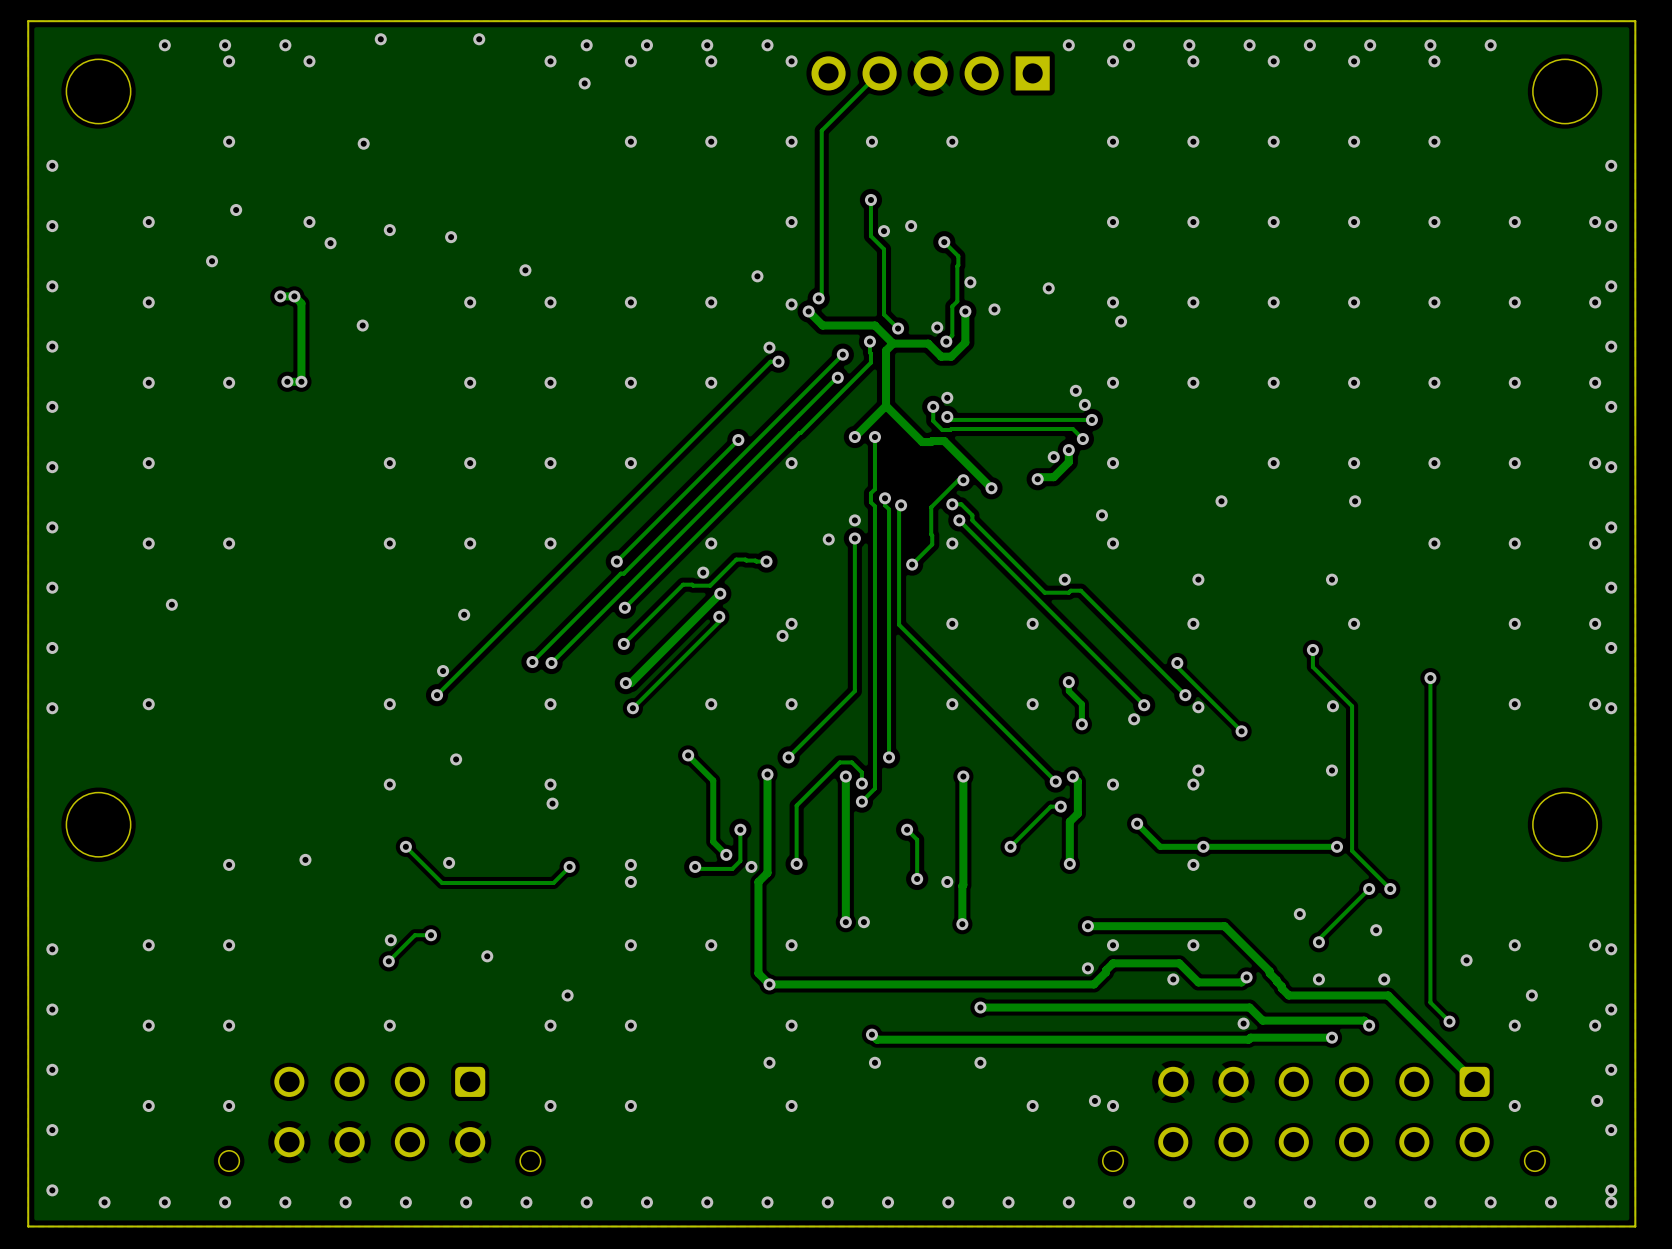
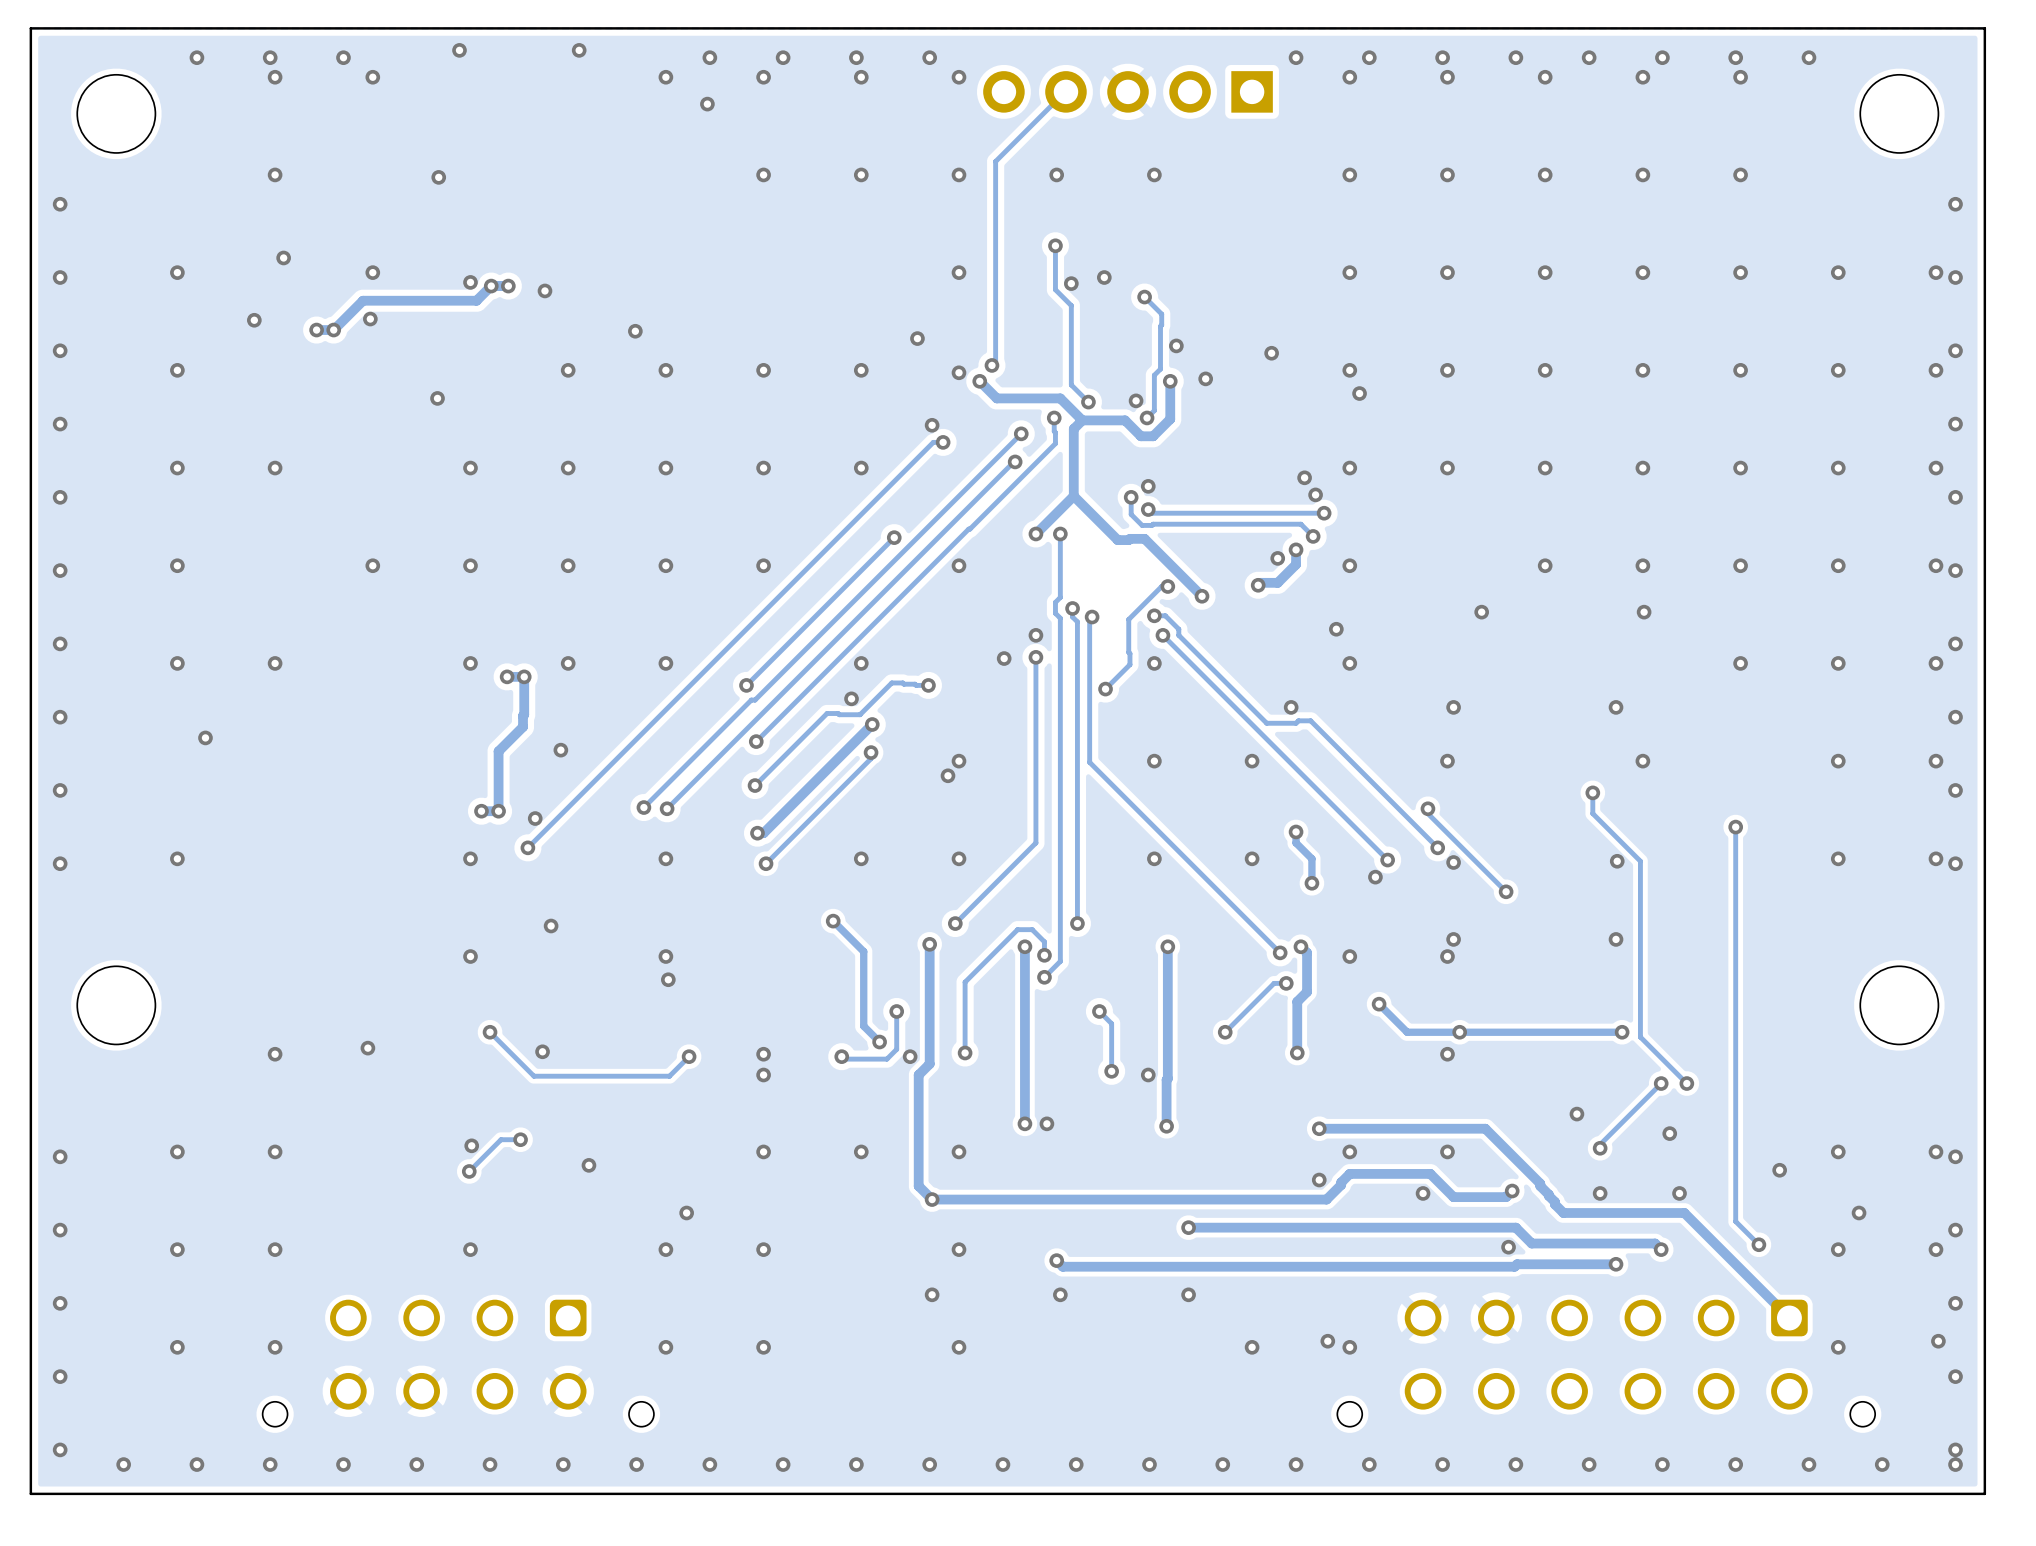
via: none -> (491, 286)
track: none -> (508, 286) (491, 286) (476, 300) (363, 300) (333, 330) (316, 330)
via: none -> (508, 286)
via: (330, 243) -> none
via: none -> (370, 319)
via: none -> (316, 330)
via: none -> (333, 330)
track: (280, 296) (294, 296) (301, 303) (301, 381) (287, 381) -> none
via: (280, 296) -> none
via: (294, 296) -> none
via: (287, 381) -> none
via: (301, 381) -> none
via: none -> (470, 468)
via: none -> (372, 565)
track: none -> (507, 676) (524, 676) (523, 726) (498, 751) (498, 811) (481, 811)
via: none -> (507, 676)
via: none -> (524, 676)
via: none -> (481, 811)
via: none -> (498, 811)

